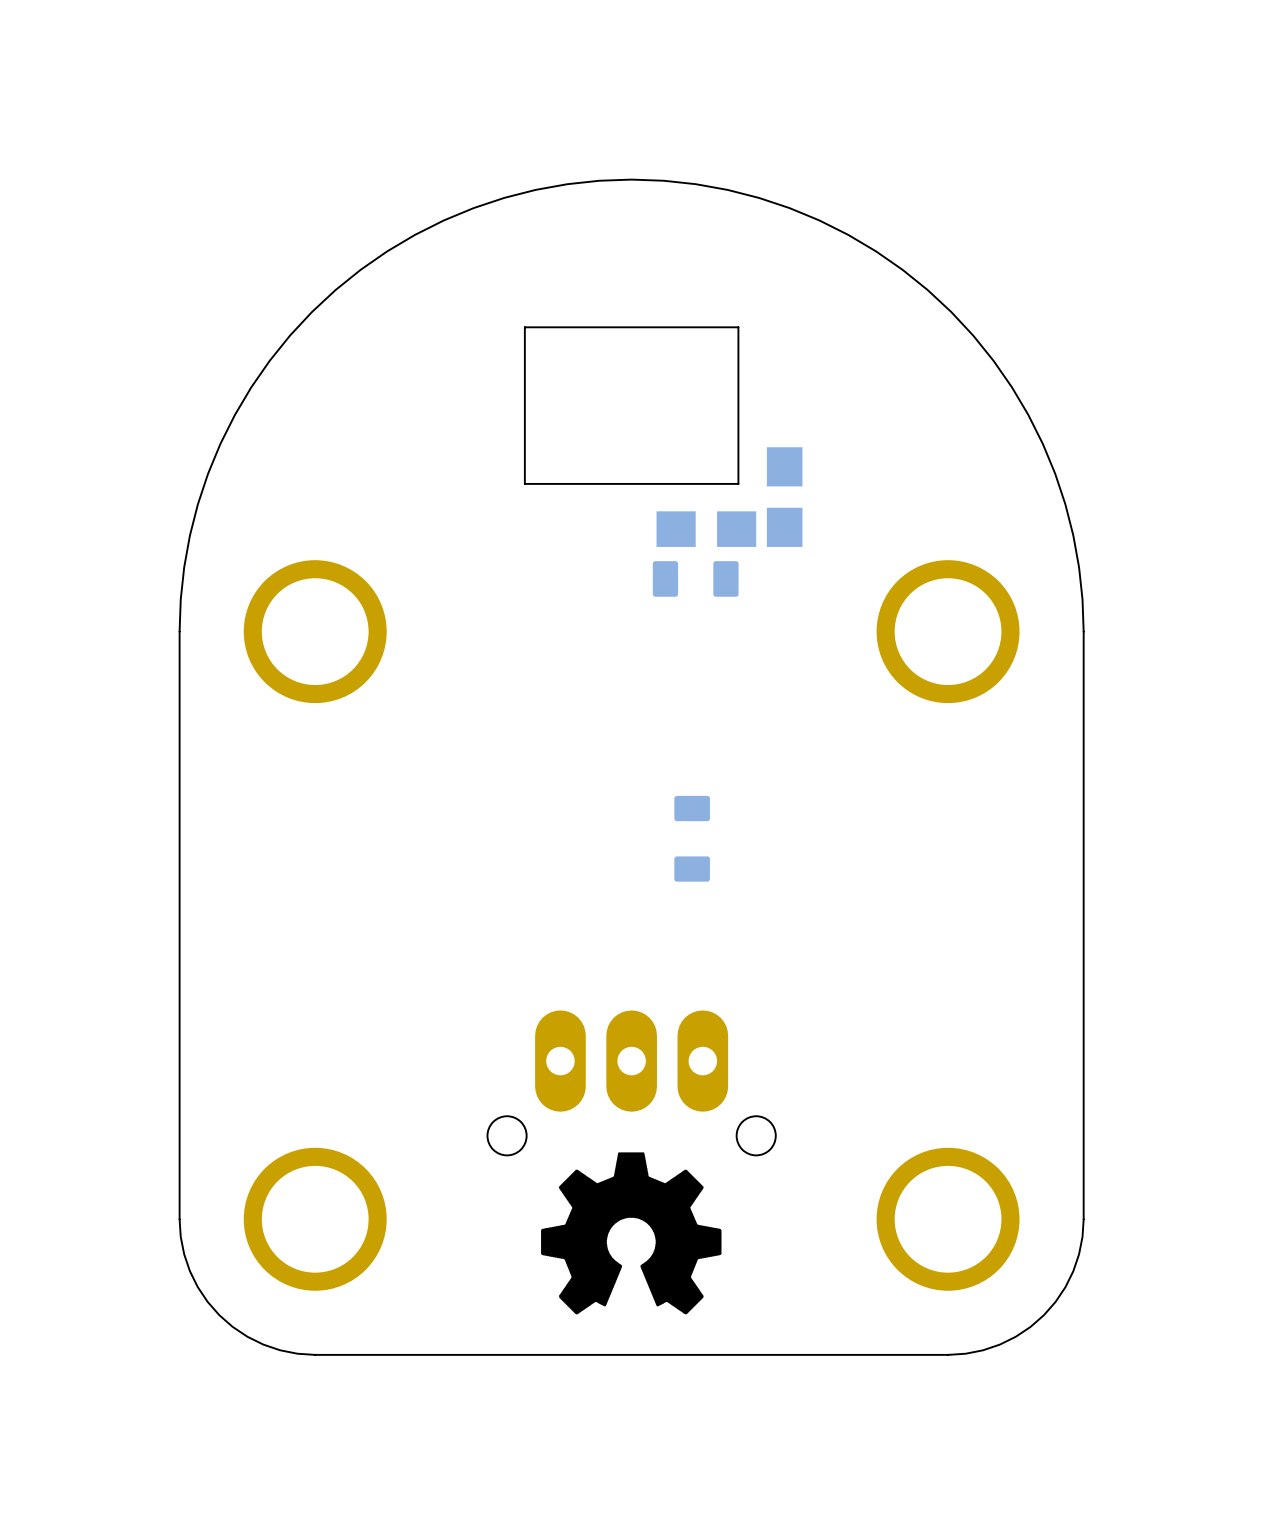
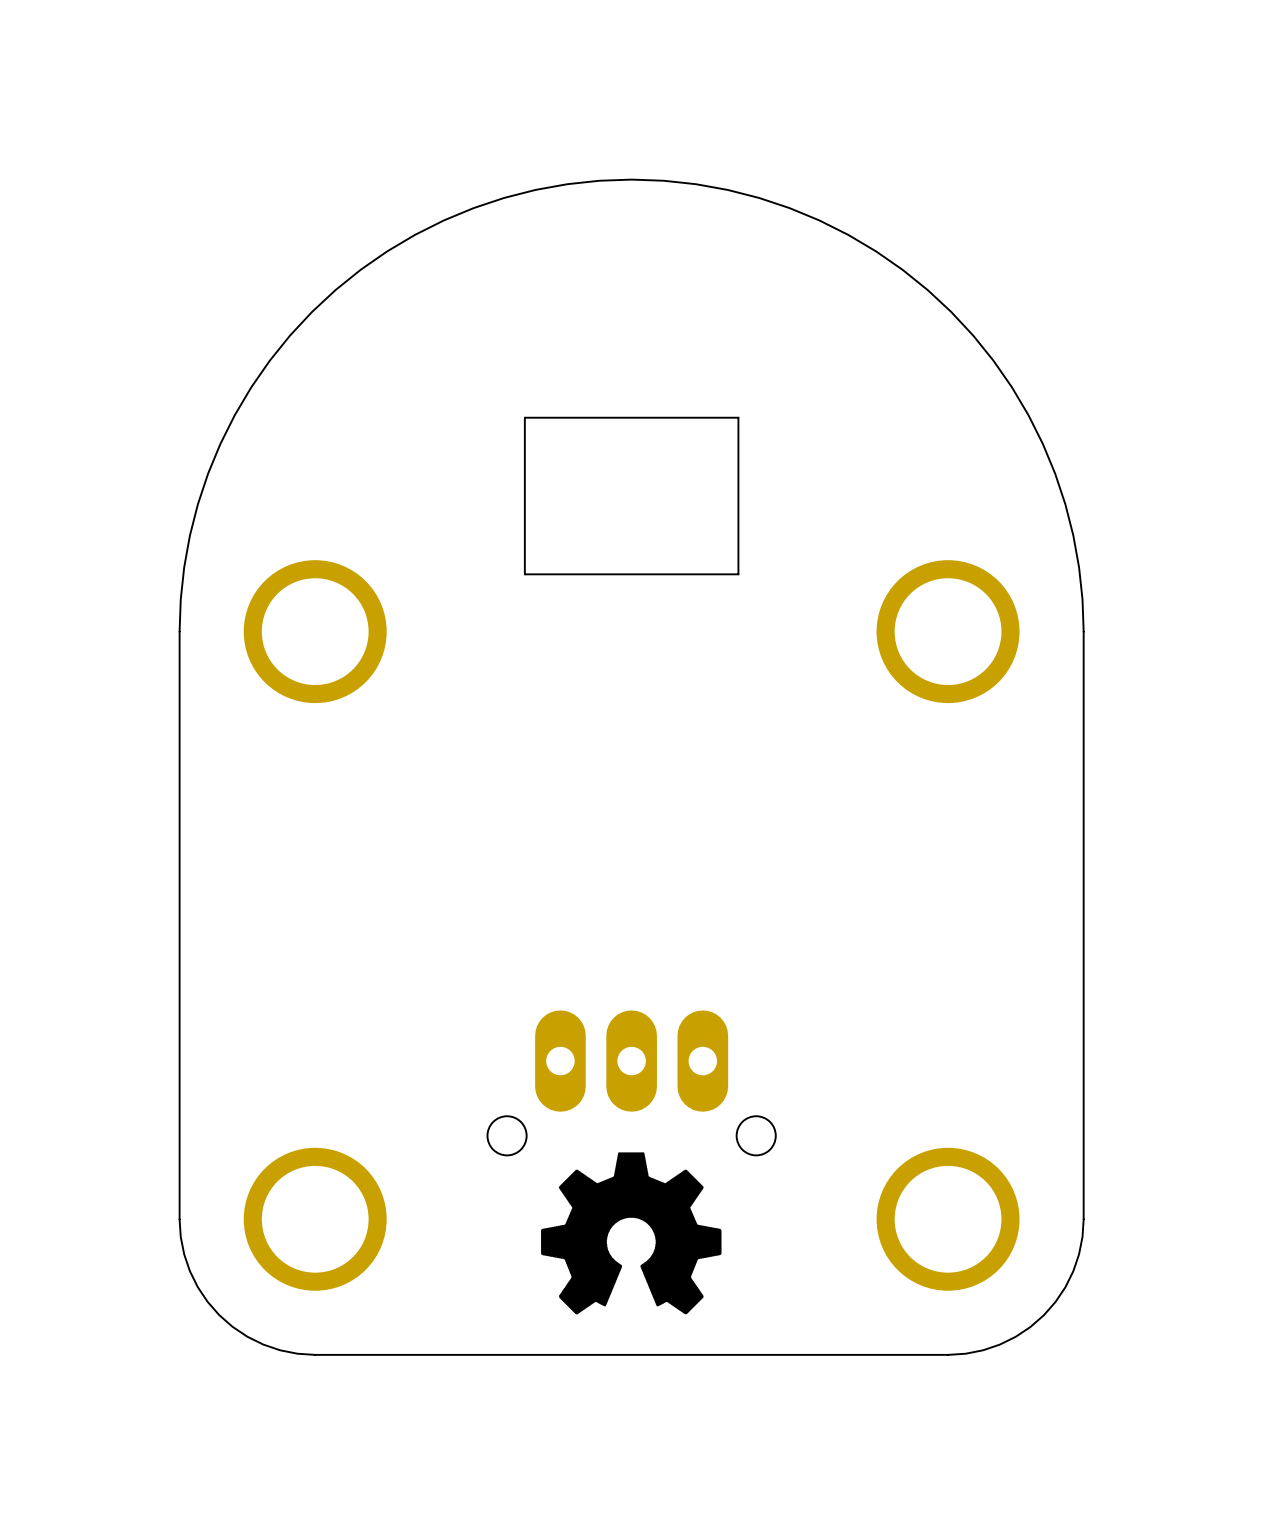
part position: (631, 405) -> (631, 496)
part: (784, 497) -> none
part: (706, 529) -> none
part: (695, 578) -> none
part: (692, 838) -> none

